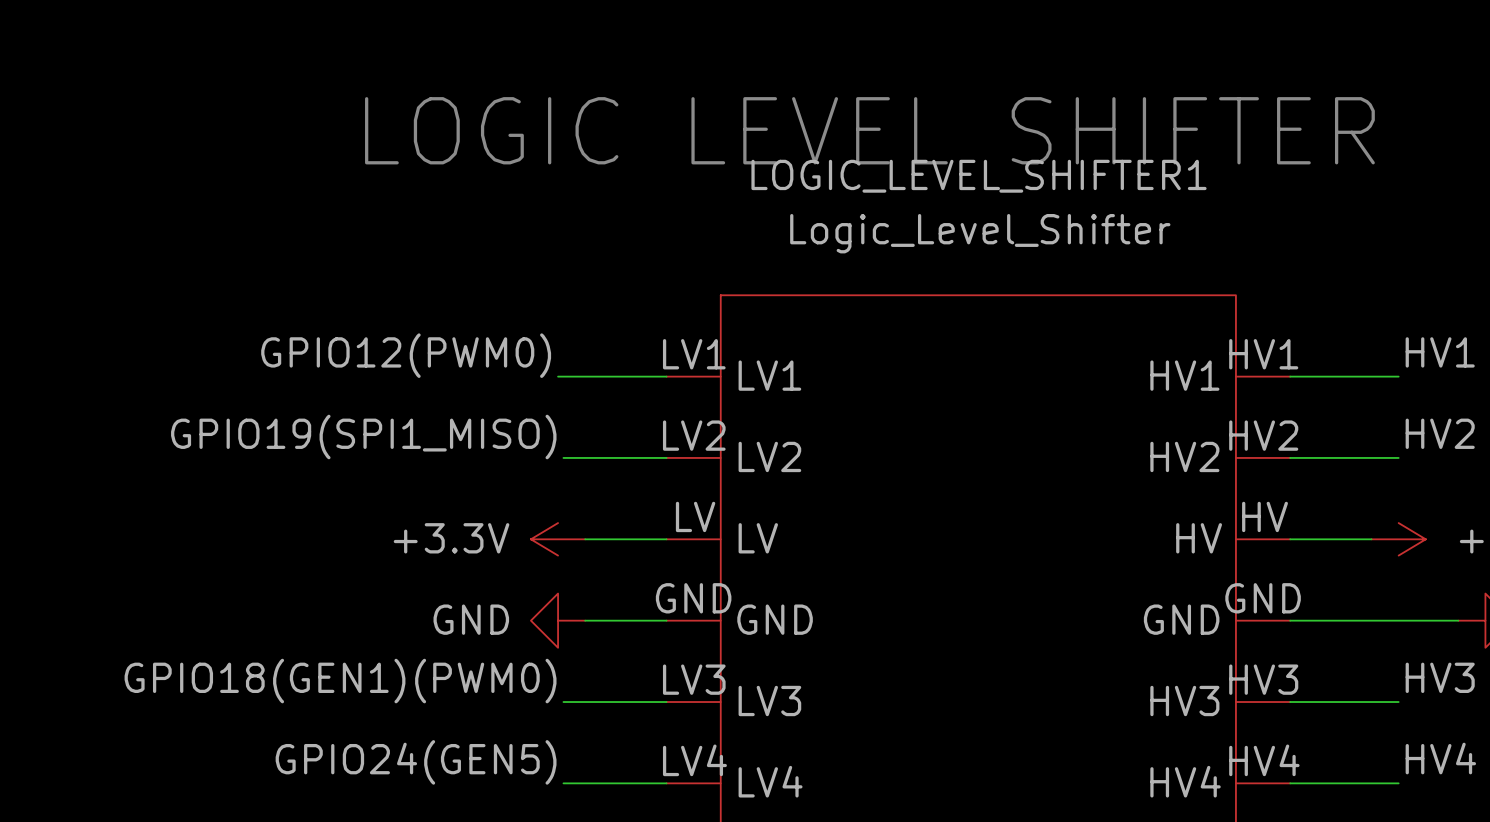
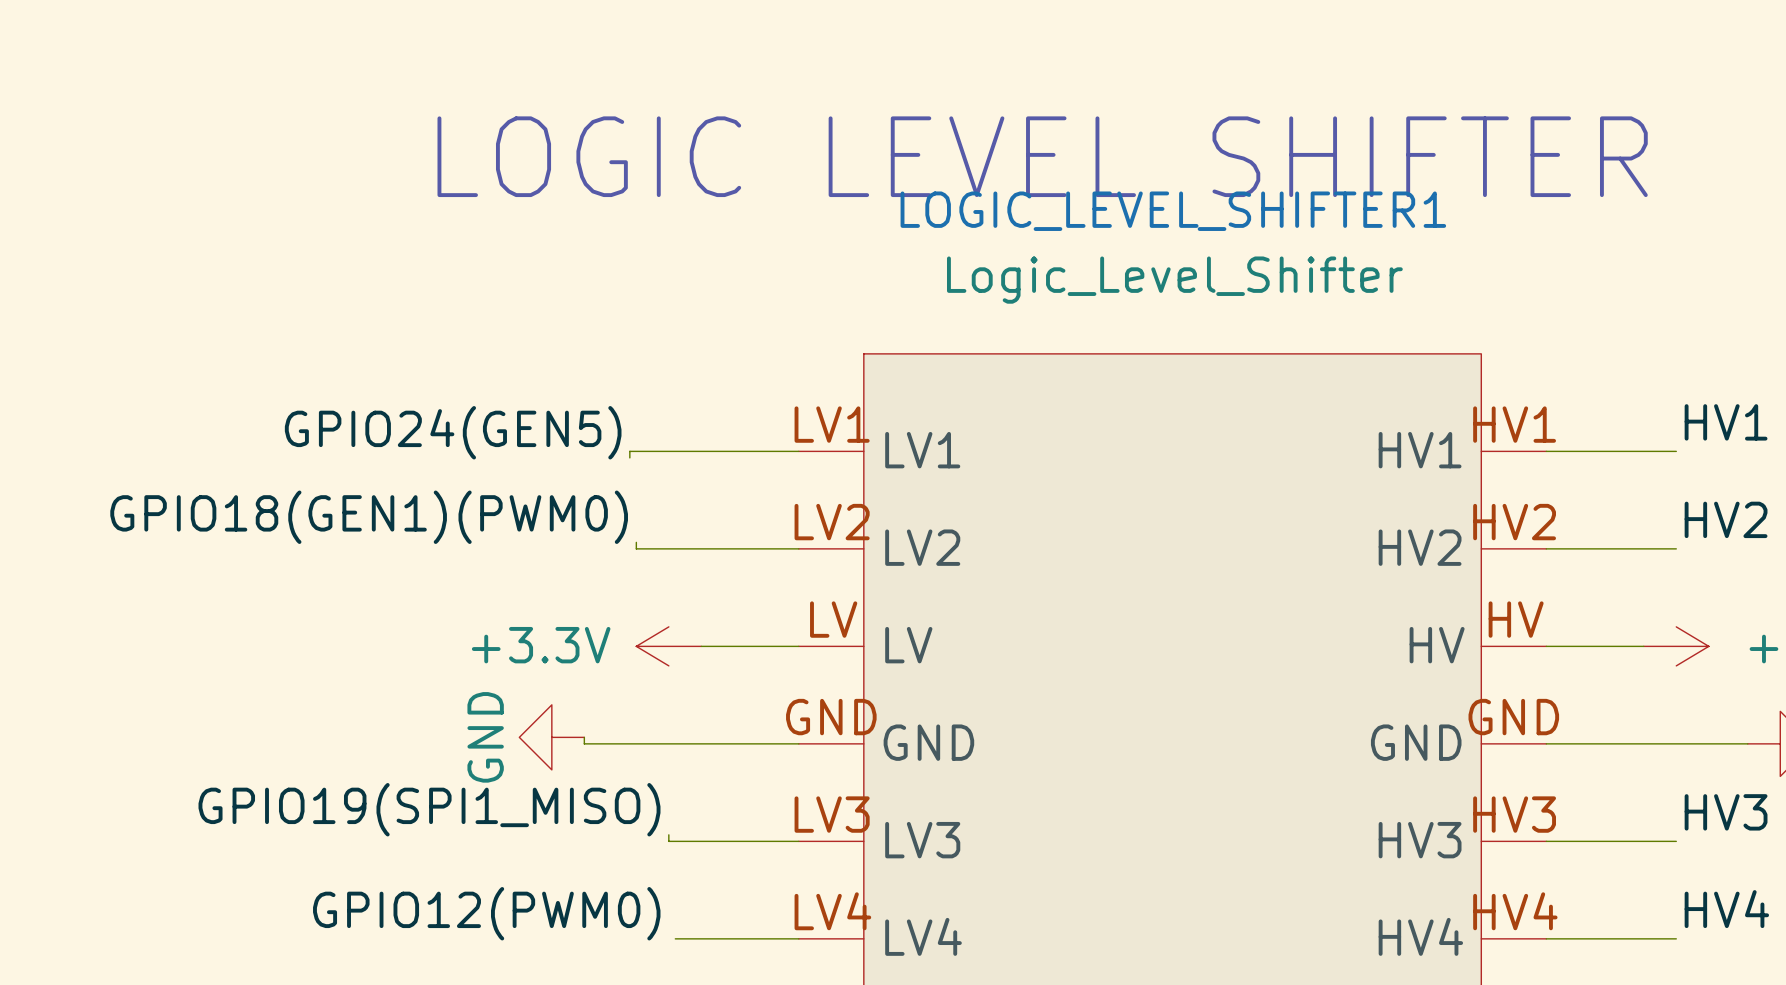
label position: GPIO12(PWM0) (406, 355) -> GPIO12(PWM0) (486, 913)
wire: none -> (668, 451) (629, 451) (629, 457)
label position: GPIO19(SPI1_MISO) (363, 437) -> GPIO19(SPI1_MISO) (429, 809)
wire: none -> (636, 542) (636, 548) (675, 548)
wire: none -> (584, 737) (584, 743) (701, 743)
power symbol text rotation: 0° (471, 619) -> 90° counterclockwise (485, 737)
power symbol position: GND (558, 620) -> GND (551, 737)
label position: GPIO18(GEN1)(PWM0) (340, 681) -> GPIO18(GEN1)(PWM0) (369, 517)
wire: none -> (668, 834) (668, 841) (675, 841)
label position: GPIO24(GEN5) (416, 762) -> GPIO24(GEN5) (453, 432)

